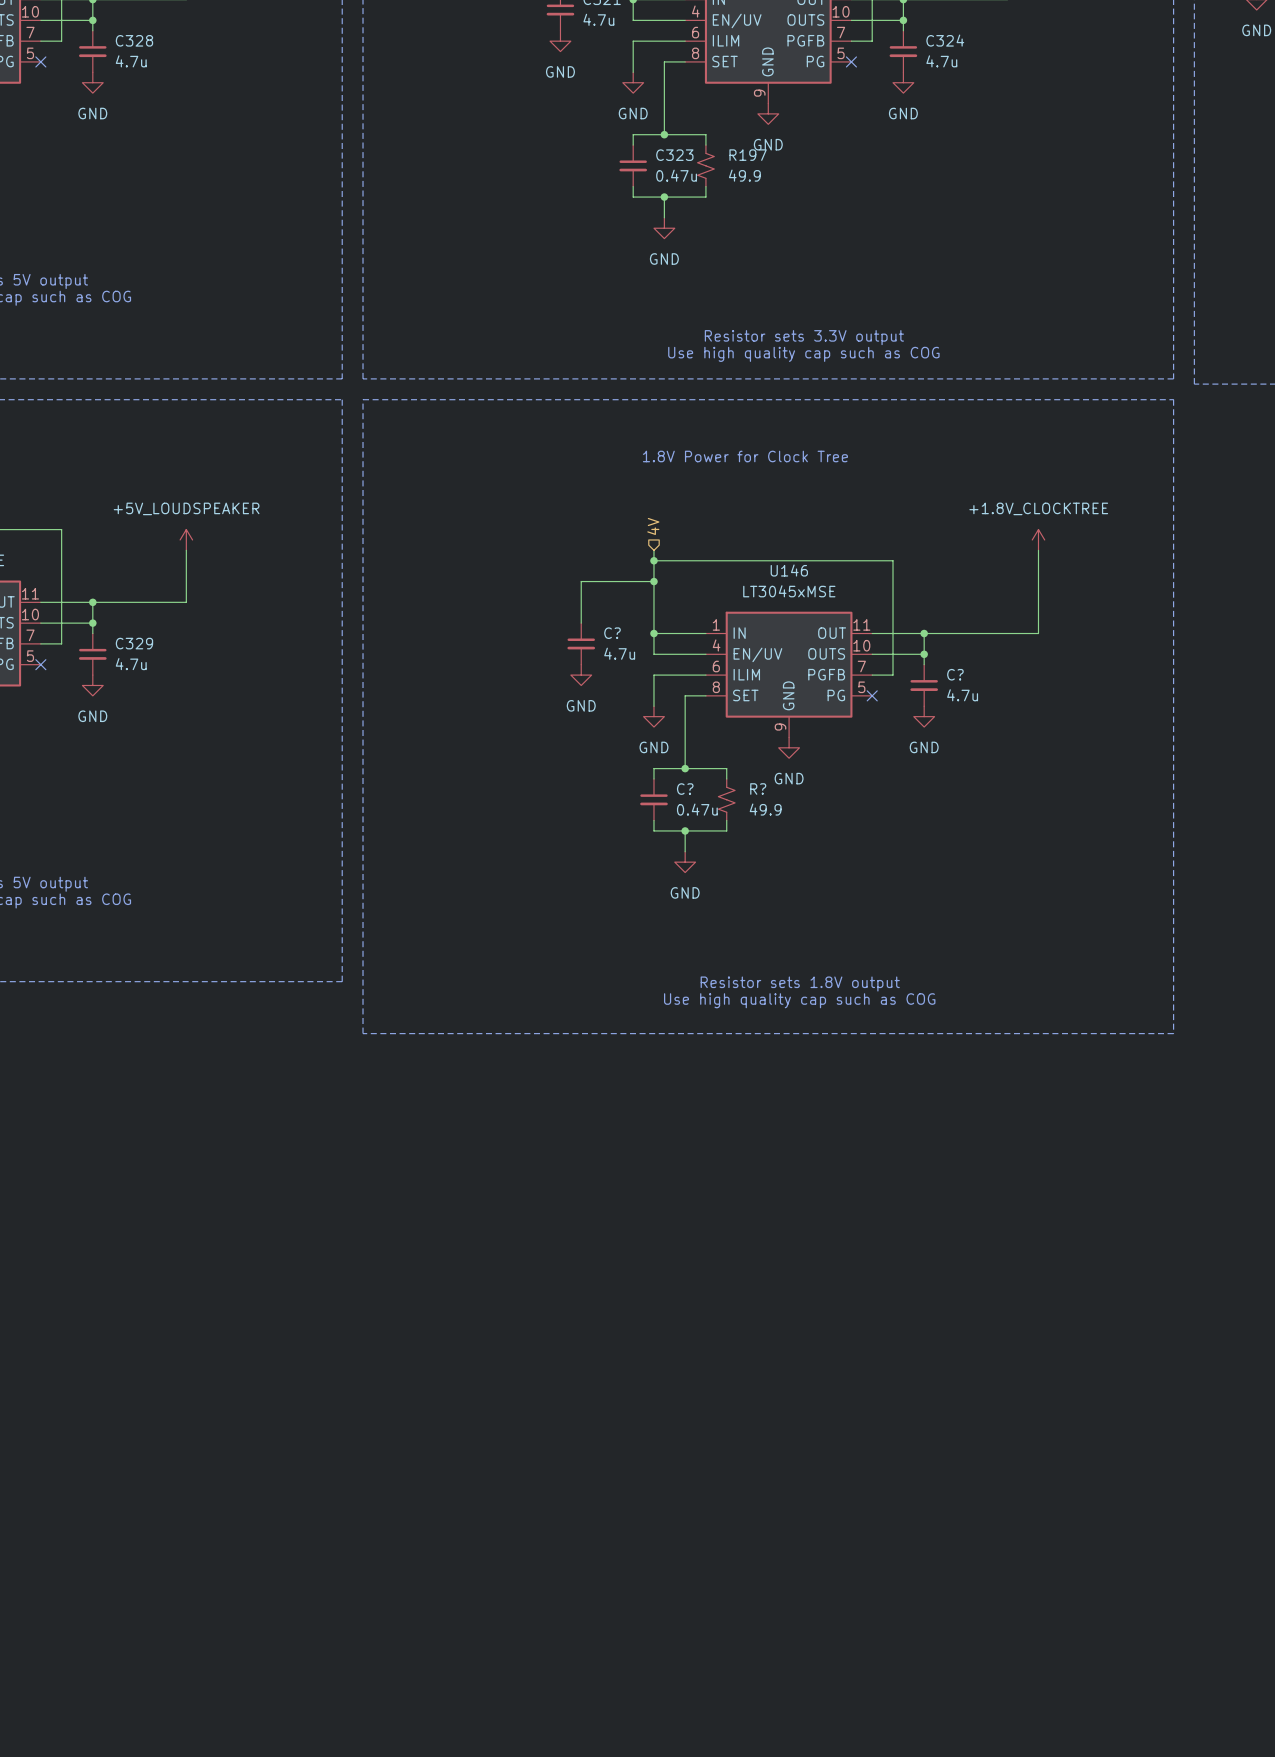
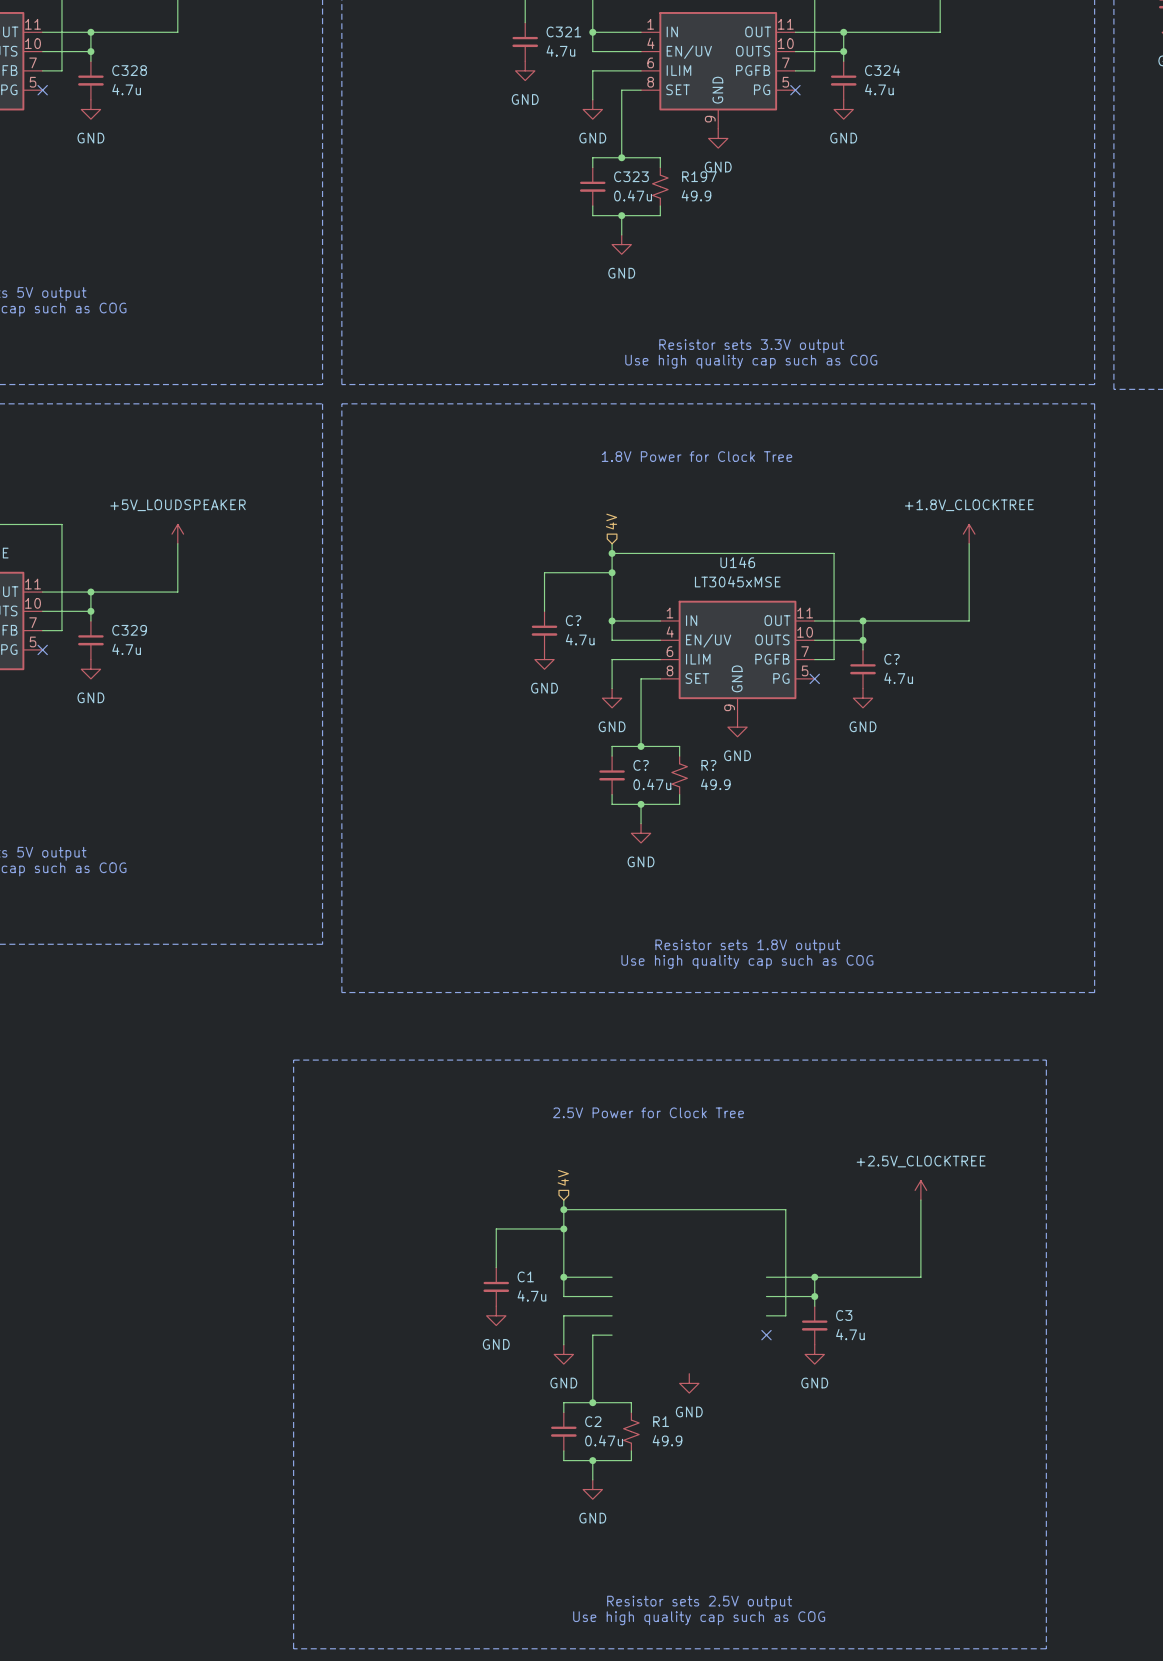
line: none -> (293, 1060) (1046, 1060) (1046, 1648) (293, 1648) (293, 1060)
text: none -> 2.5V Power for Clock Tree (648, 1112)
hierarchical label: none -> 4V (563, 1177)
power symbol: none -> +2.5V_CLOCKTREE (920, 1190)
wire: none -> (563, 1200) (563, 1296) (612, 1296)
wire: none -> (920, 1200) (920, 1277) (766, 1277)
wire: none -> (563, 1209) (785, 1209) (785, 1315) (766, 1315)
junction: none -> (563, 1209)
wire: none -> (563, 1228) (496, 1228) (496, 1267)
junction: none -> (563, 1228)
wire: none -> (563, 1277) (612, 1277)
junction: none -> (563, 1277)
wire: none -> (814, 1277) (814, 1306)
junction: none -> (814, 1277)
C1: none -> 4.7u (496, 1286)
wire: none -> (766, 1296) (814, 1296)
junction: none -> (814, 1296)
power symbol: none -> GND (496, 1315)
wire: none -> (612, 1315) (563, 1315) (563, 1344)
C3: none -> 4.7u (814, 1325)
wire: none -> (612, 1335) (592, 1335) (592, 1402)
no-connect mark: none -> (766, 1335)
power symbol: none -> GND (563, 1354)
power symbol: none -> GND (814, 1354)
power symbol: none -> GND (689, 1383)
junction: none -> (592, 1402)
wire: none -> (563, 1412) (563, 1402) (631, 1402) (631, 1412)
C2: none -> 0.47u (563, 1431)
R1: none -> 49.9 (631, 1431)
wire: none -> (563, 1450) (563, 1460) (631, 1460) (631, 1450)
wire: none -> (592, 1460) (592, 1479)
junction: none -> (592, 1460)
power symbol: none -> GND (592, 1489)
text: none -> Resistor sets 2.5V output (699, 1602)
text: none -> Use high quality cap such as COG (699, 1618)

